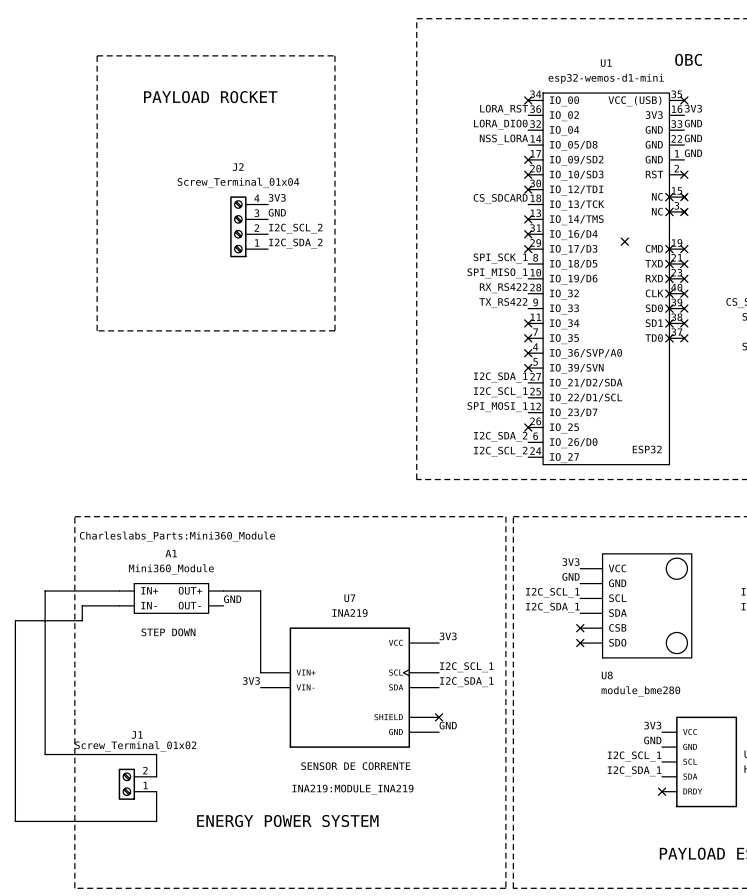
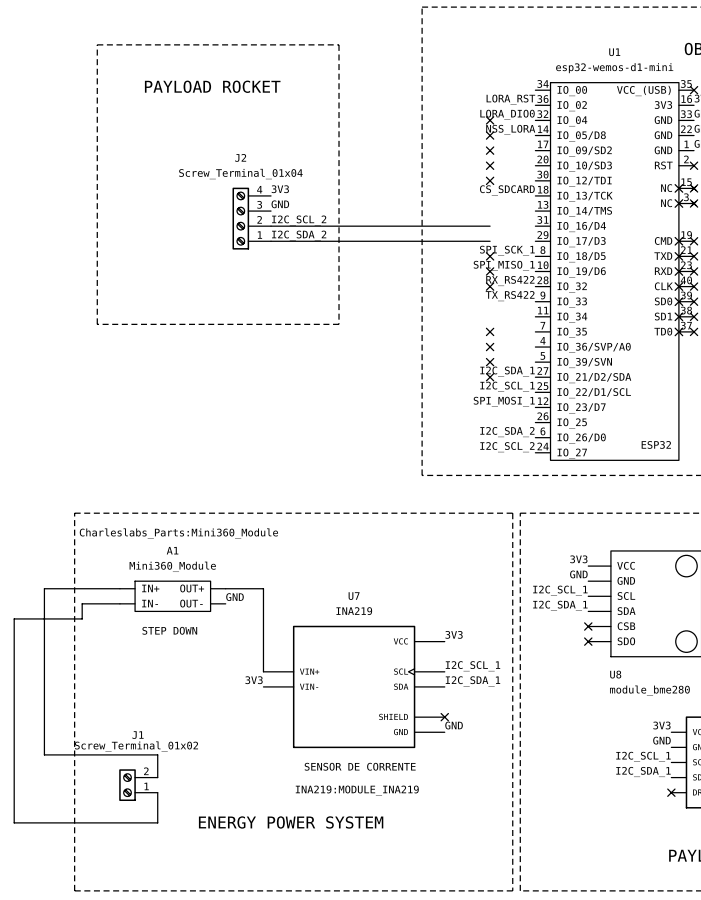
no-connect mark: (528, 100) -> none
no-connect mark: none -> (490, 120)
no-connect mark: none -> (490, 135)
no-connect mark: none -> (490, 150)
no-connect mark: (528, 159) -> none
no-connect mark: none -> (490, 165)
no-connect mark: (528, 174) -> none
no-connect mark: none -> (490, 180)
no-connect mark: (528, 189) -> none
no-connect mark: (528, 219) -> none
wire: none -> (271, 226) (490, 226)
no-connect mark: (528, 234) -> none
no-connect mark: (624, 241) -> none
wire: none -> (271, 241) (490, 241)
no-connect mark: (528, 249) -> none
no-connect mark: none -> (490, 256)
no-connect mark: none -> (490, 271)
no-connect mark: none -> (490, 286)
no-connect mark: (528, 323) -> none
no-connect mark: none -> (490, 331)
no-connect mark: (528, 338) -> none
no-connect mark: none -> (490, 347)
no-connect mark: (528, 353) -> none
no-connect mark: none -> (490, 362)
no-connect mark: (528, 368) -> none
no-connect mark: none -> (490, 377)
no-connect mark: (528, 427) -> none

